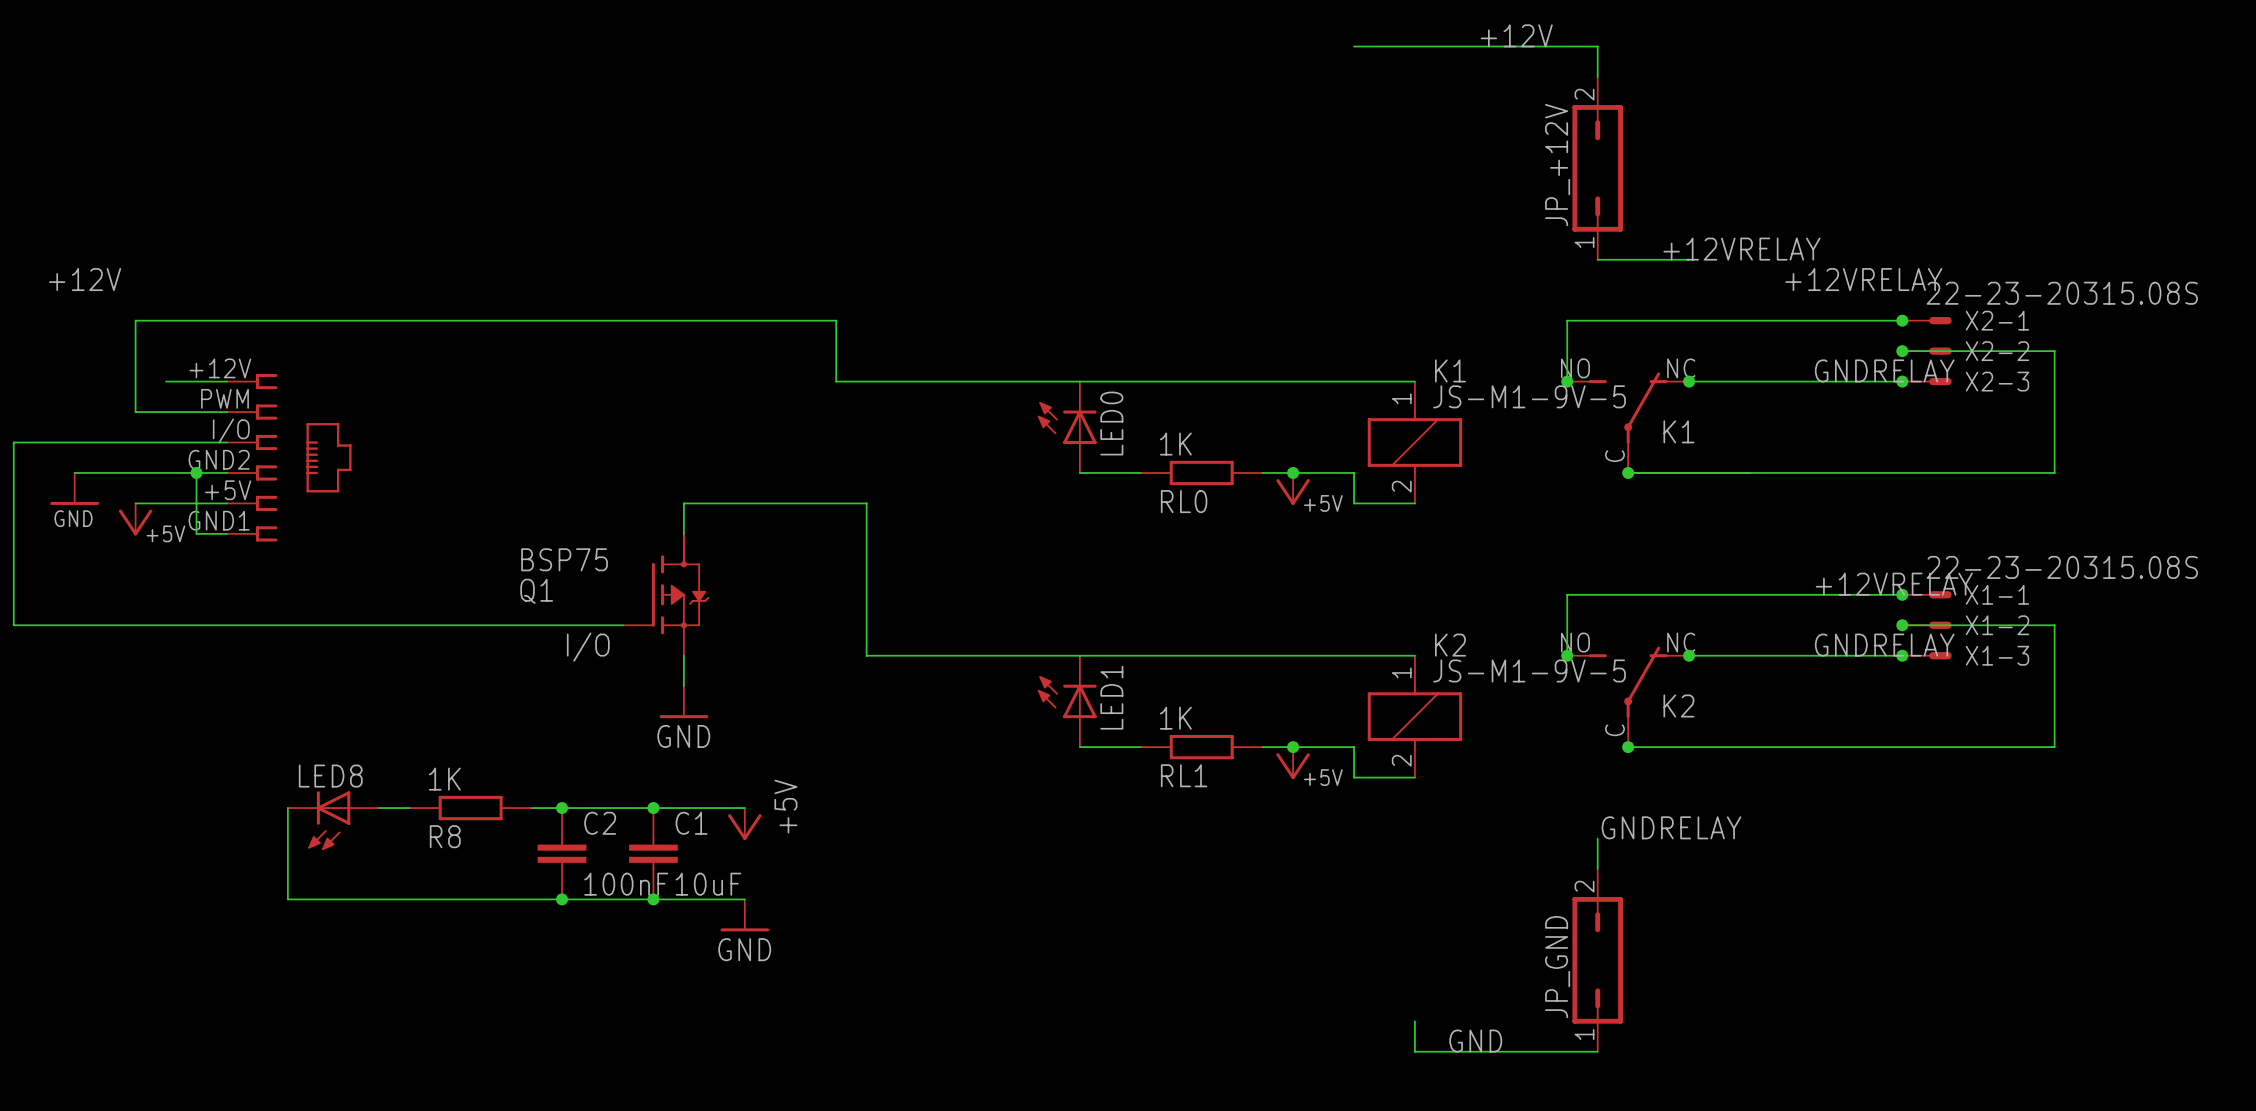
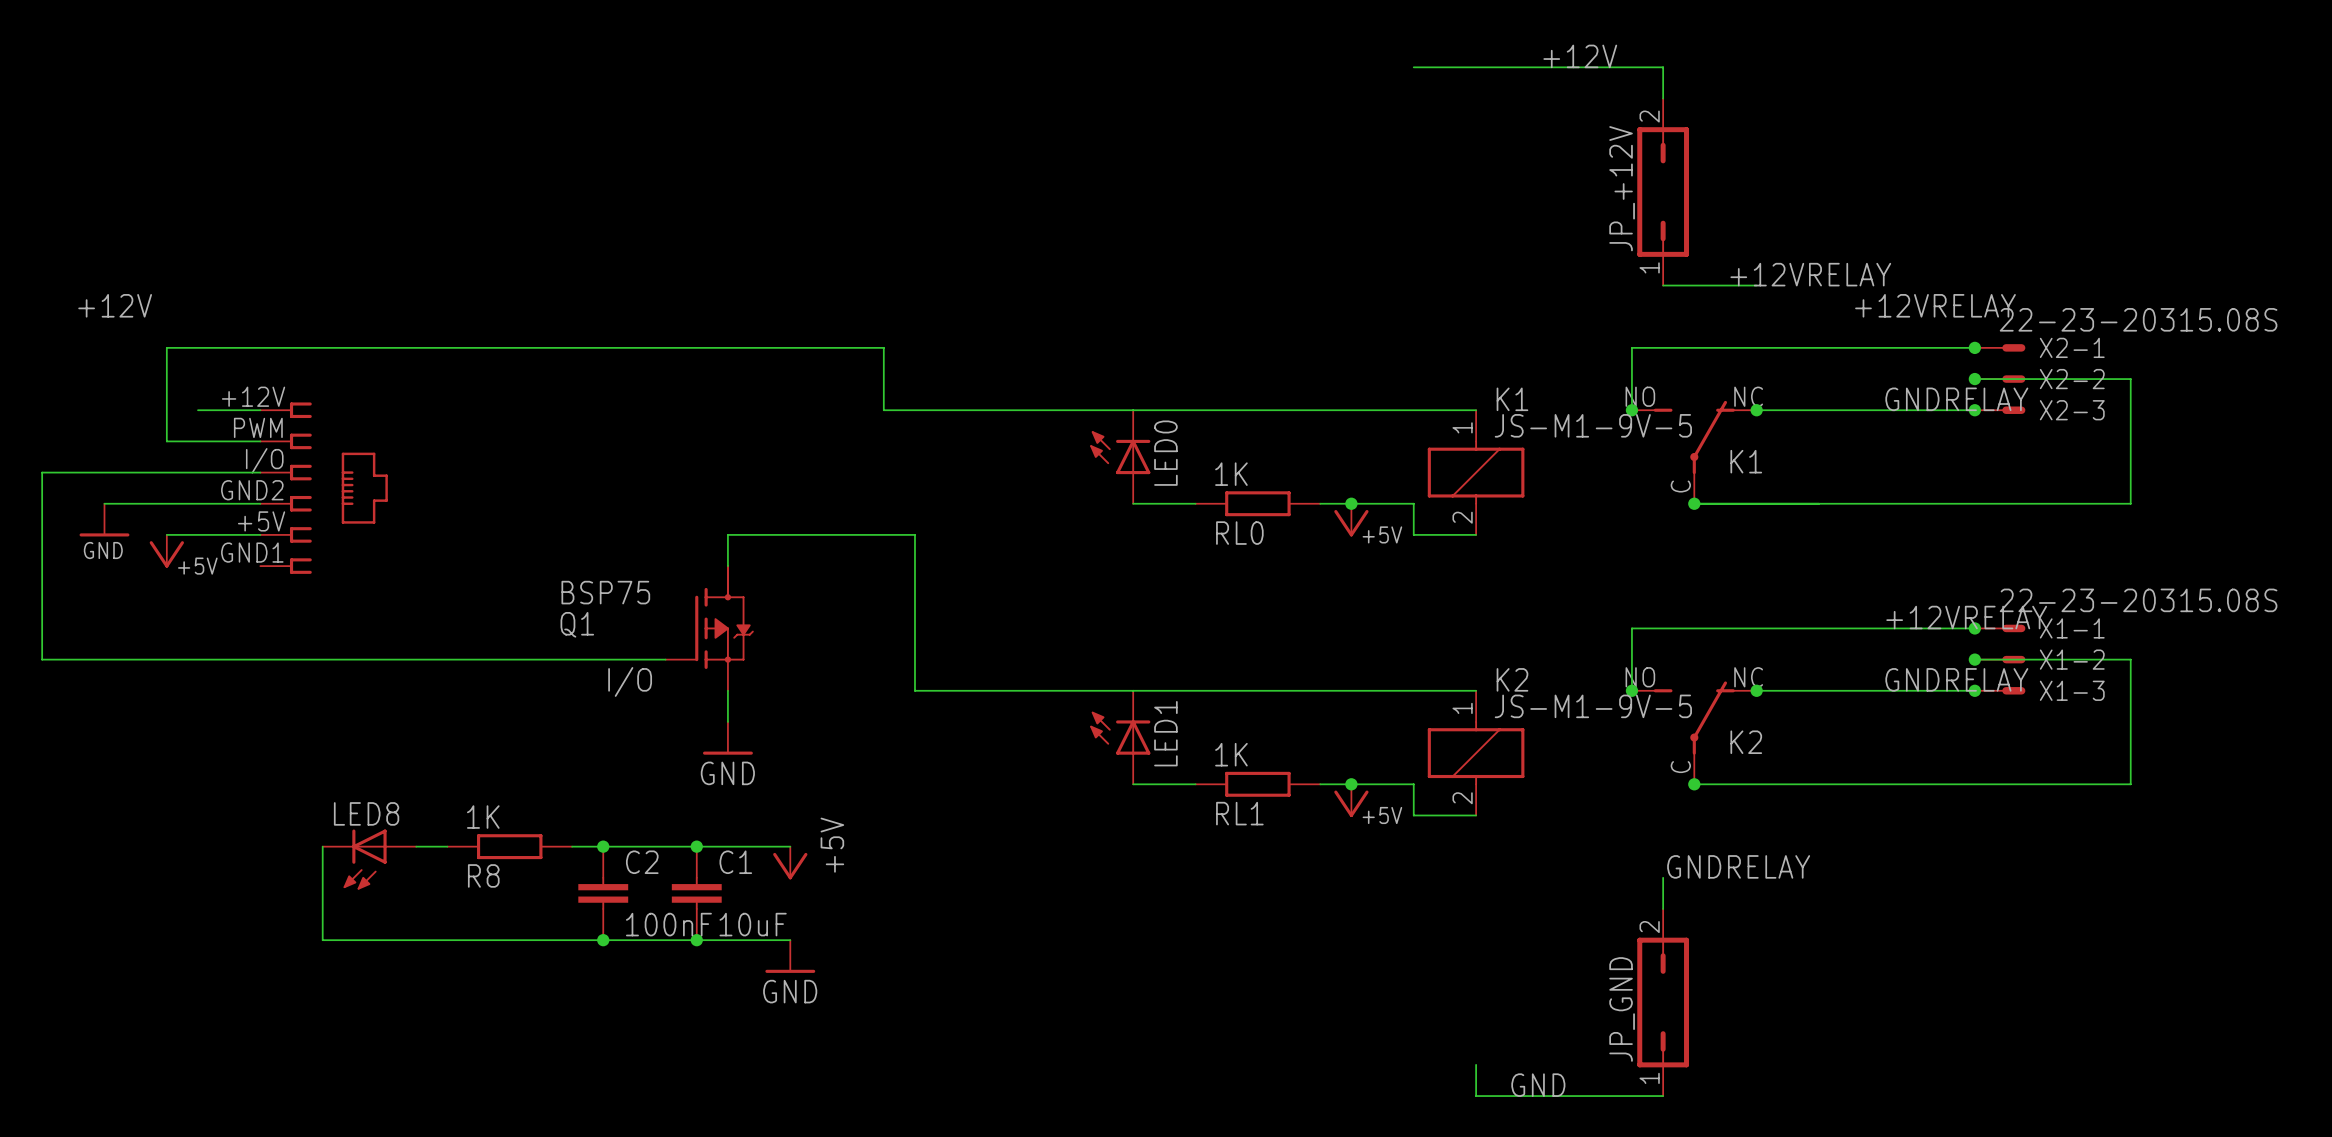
wire: (196, 472) (196, 533) (226, 533) -> none
junction: (196, 472) -> none

